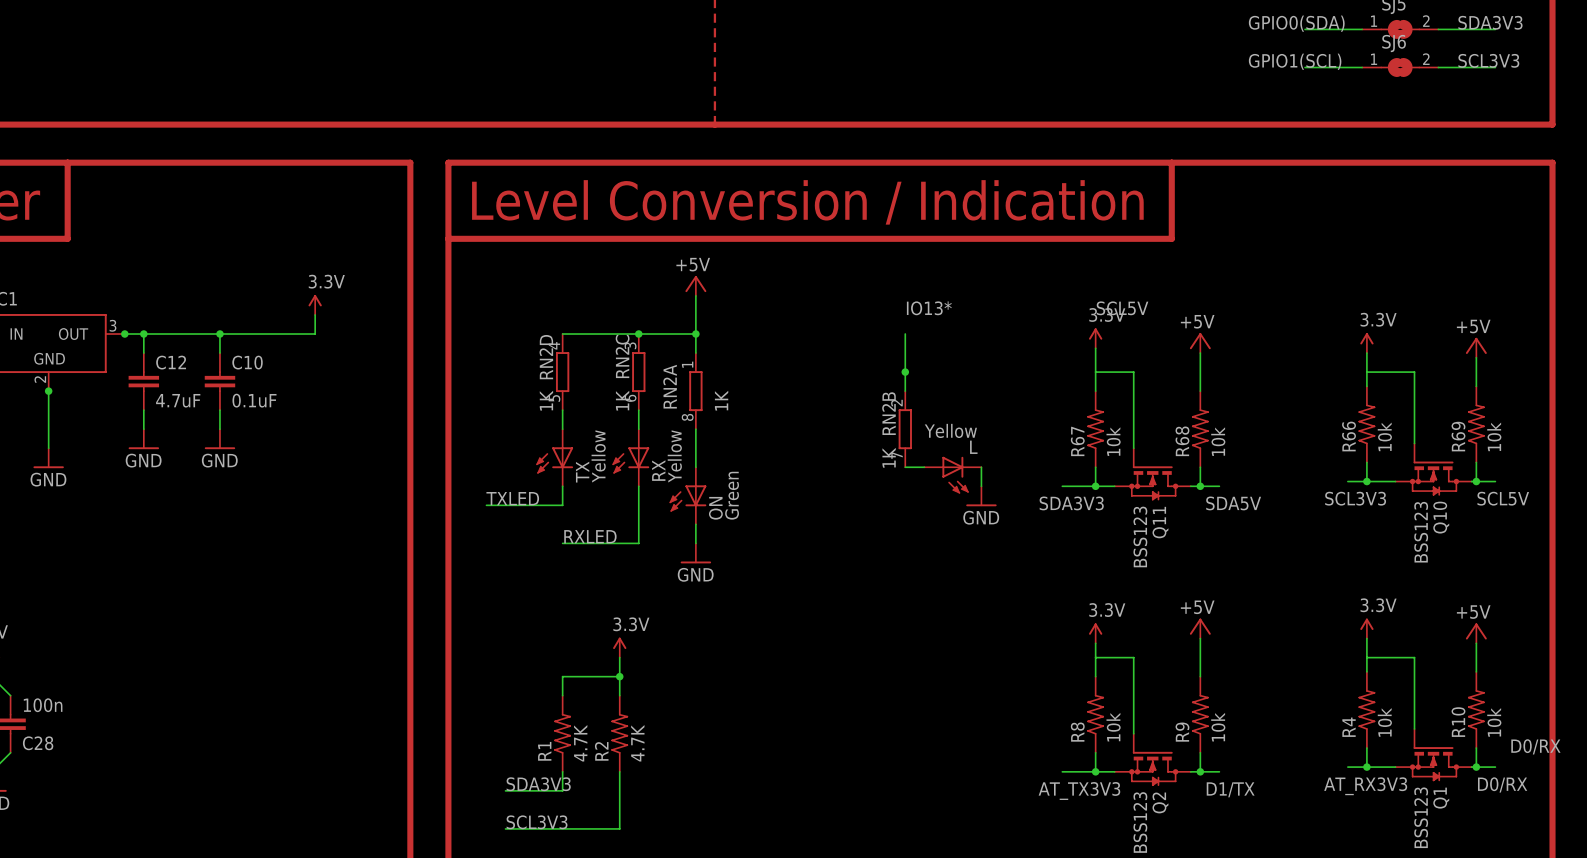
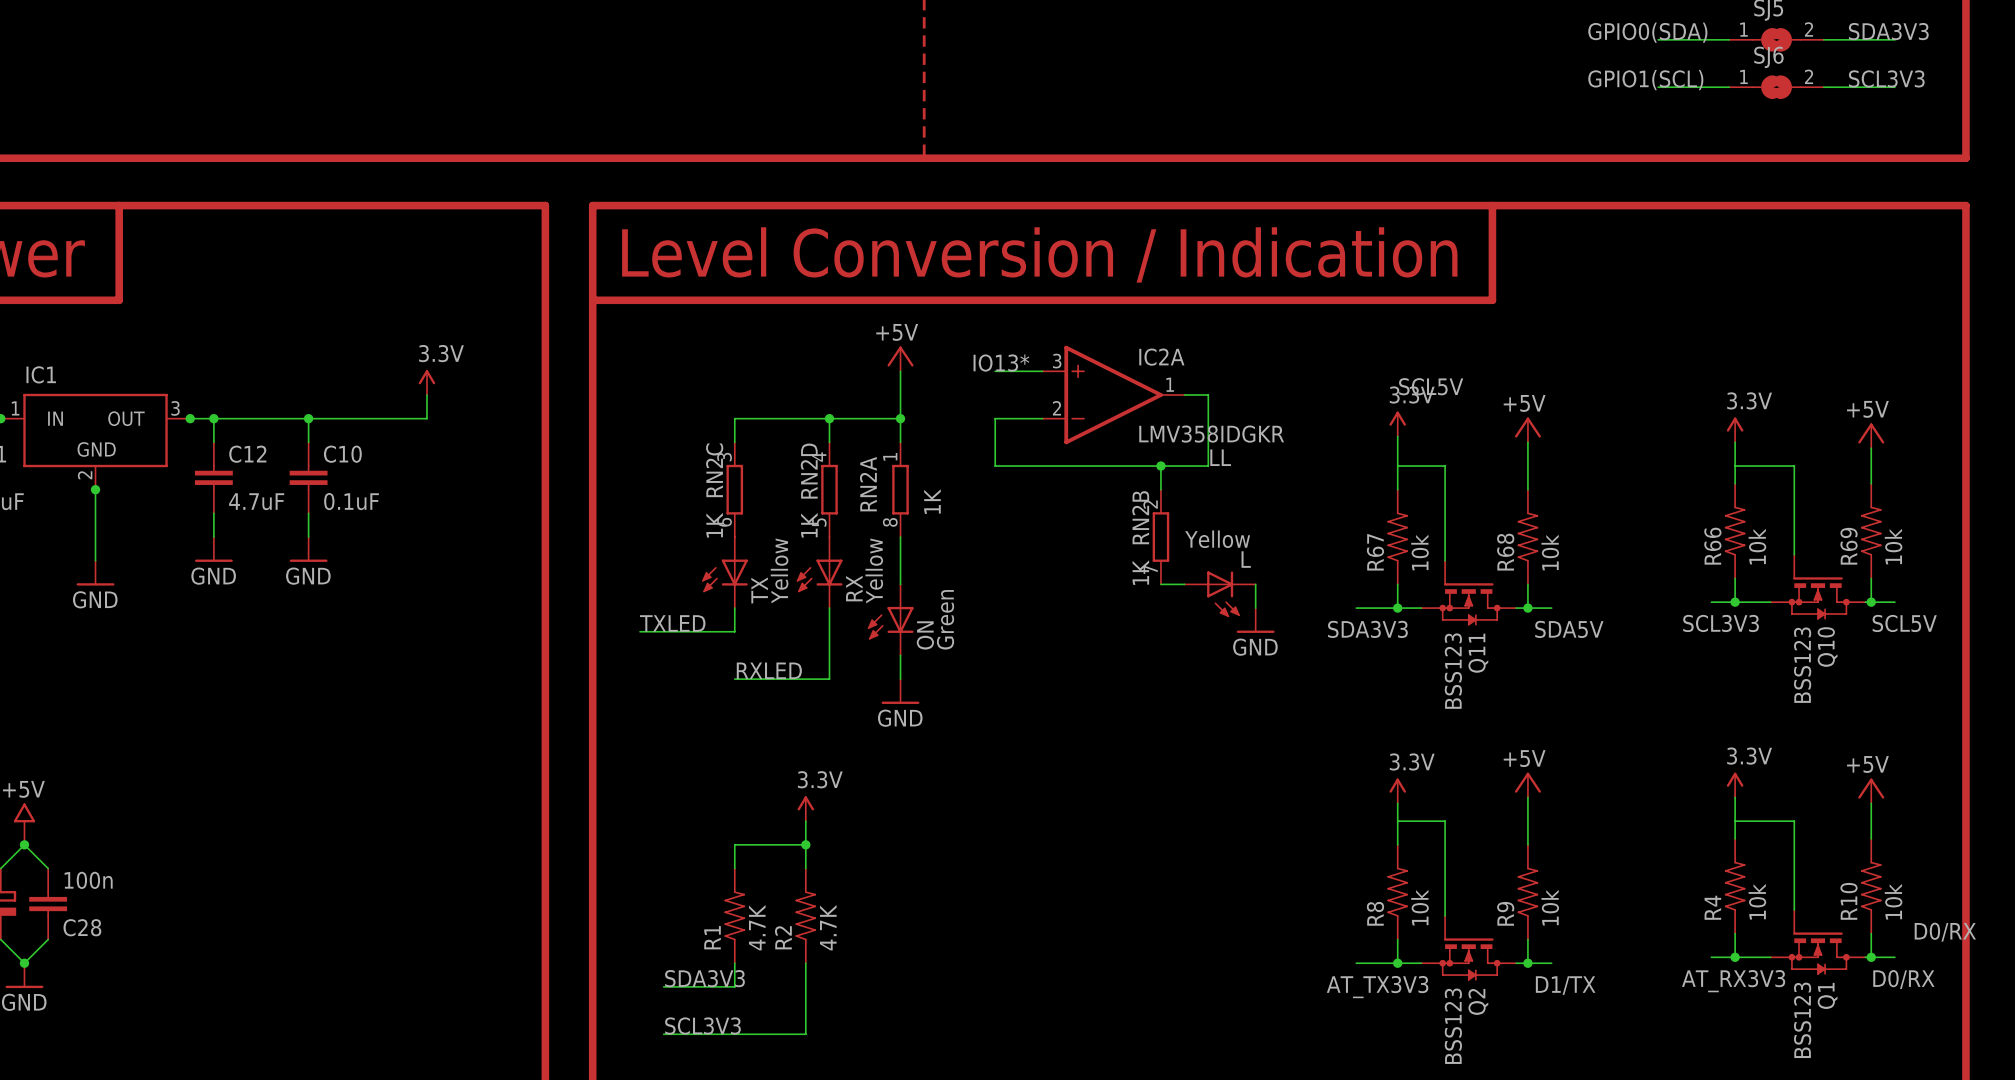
wire: none -> (995, 371) (1042, 371)
label position: IO13* (929, 308) -> IO13* (1001, 363)
IC2A: none -> LMV358IDGKR (1113, 394)
wire: none -> (1184, 394) (1208, 394) (1208, 466) (995, 466) (995, 418) (1042, 418)
wire: (905, 334) (905, 372) -> none
label: none -> LL (1220, 457)
RN2D position: (562, 372) -> (829, 489)
RN2C position: (638, 372) -> (734, 489)

